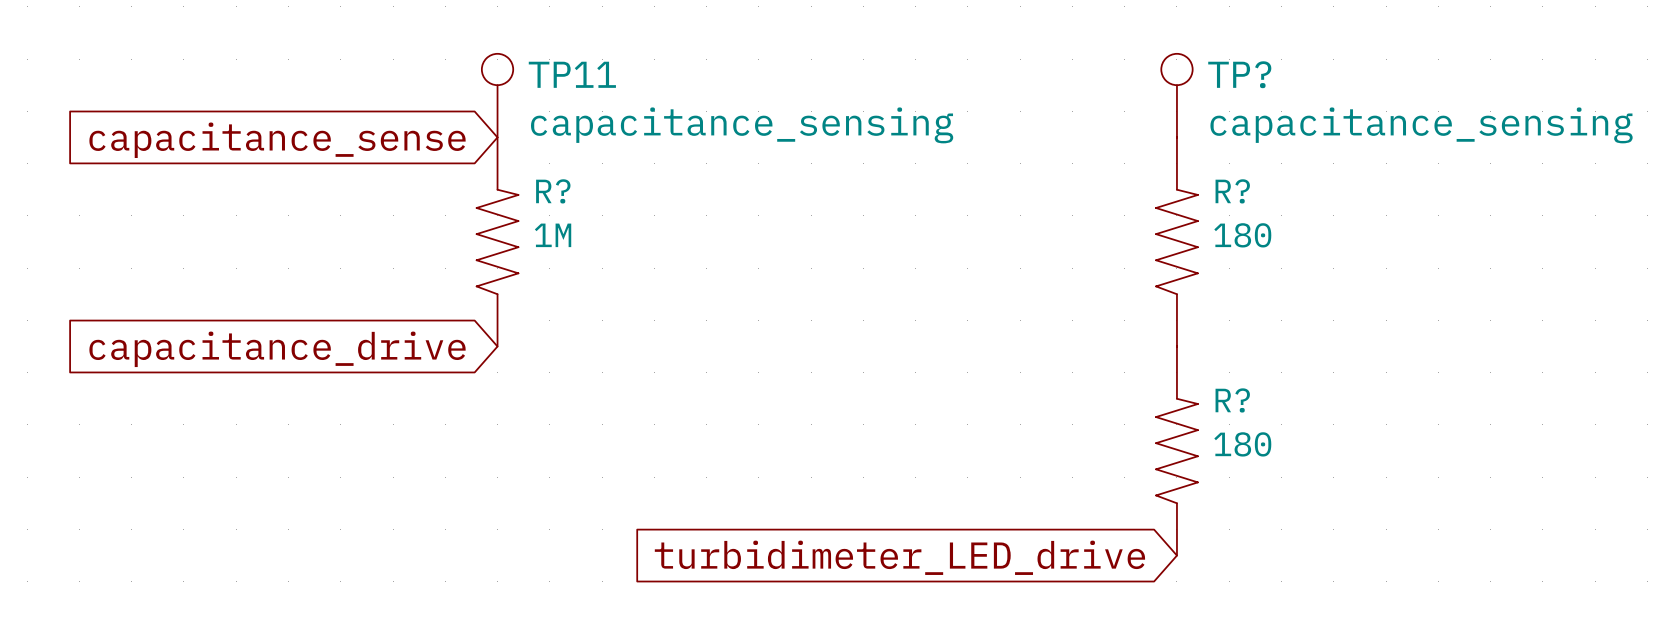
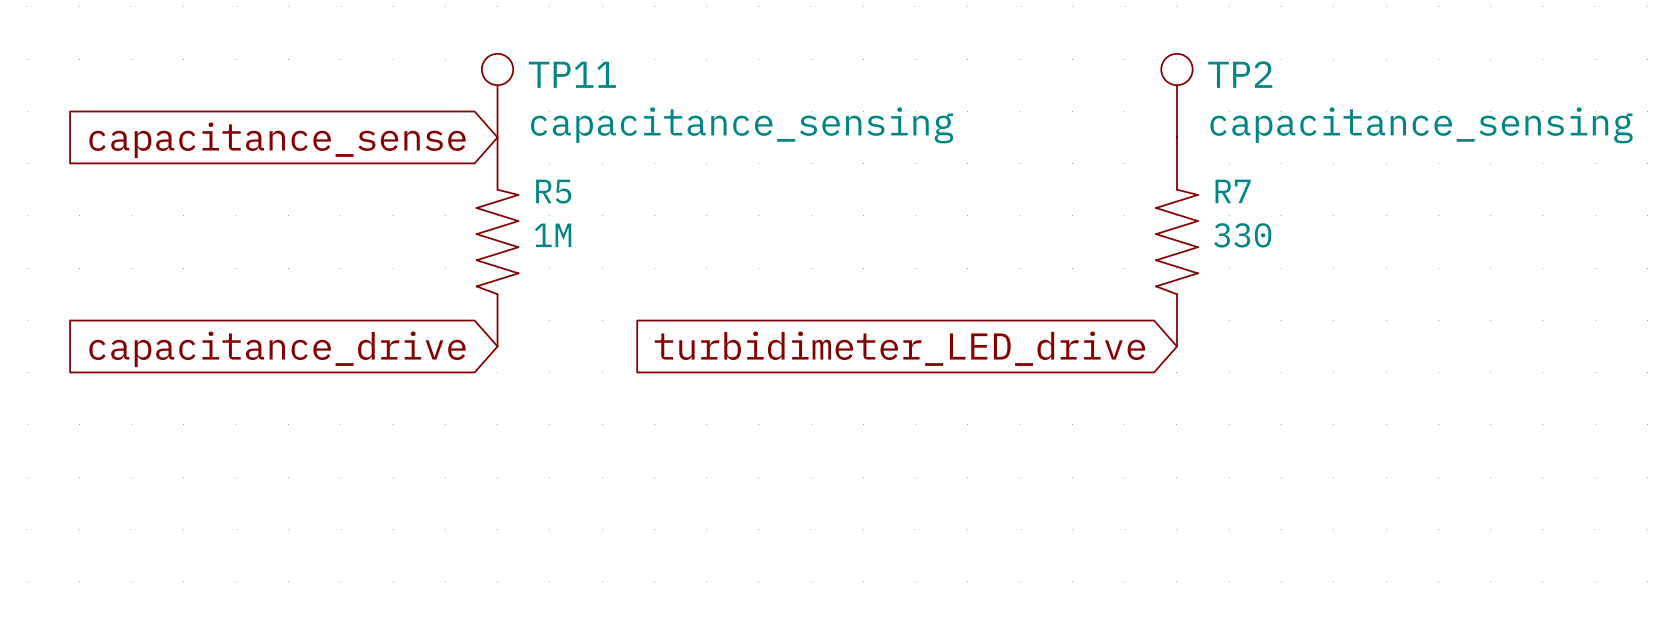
TP? name: TP? (1239, 74) -> TP2 (1240, 74)
R? name: R? (553, 191) -> R5 (553, 191)
R? name: R? (1232, 191) -> R7 (1233, 191)
R? value: 180 (1242, 235) -> 330 (1242, 235)
R?: 180 (1176, 451) -> none
global label position: turbidimeter_LED_drive (899, 557) -> turbidimeter_LED_drive (899, 348)

